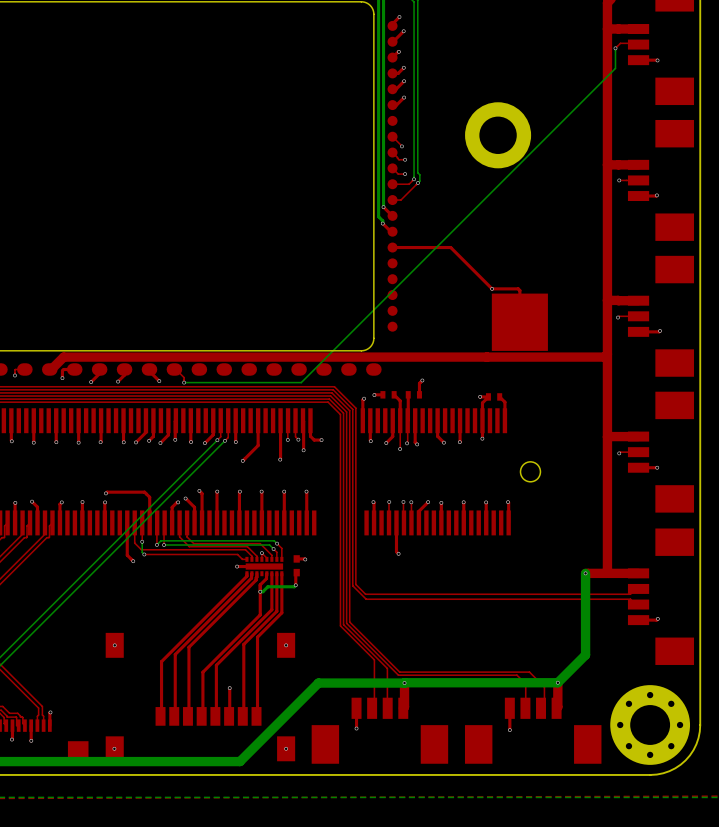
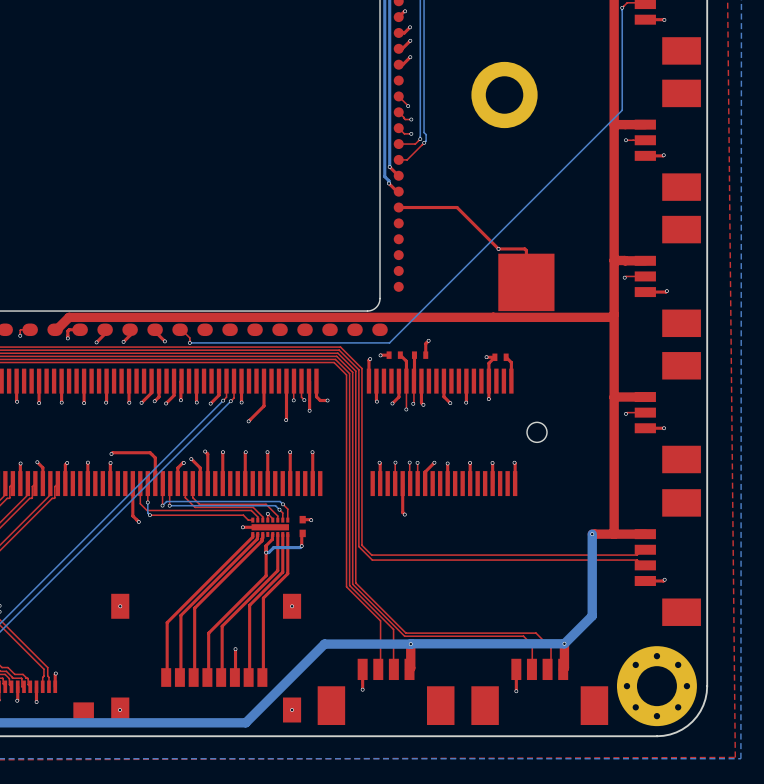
bottom track: (615, 68) (301, 382) -> (622, 27) (622, 110) (389, 342) (307, 342)

